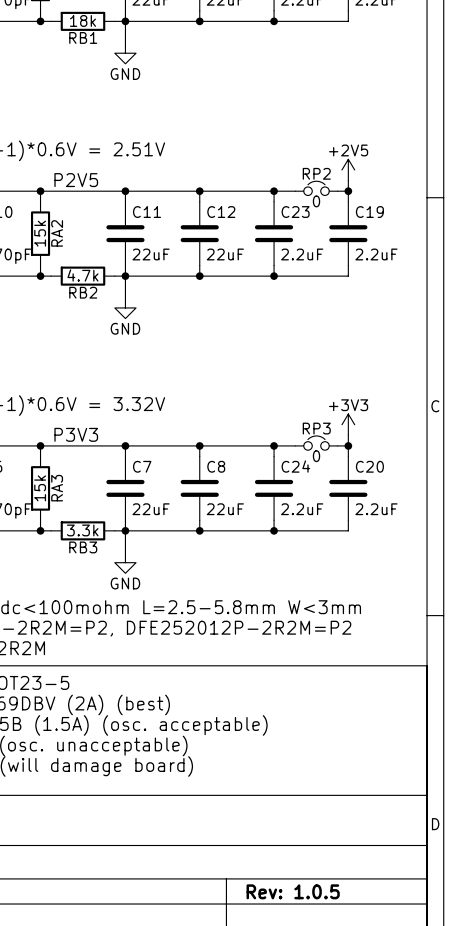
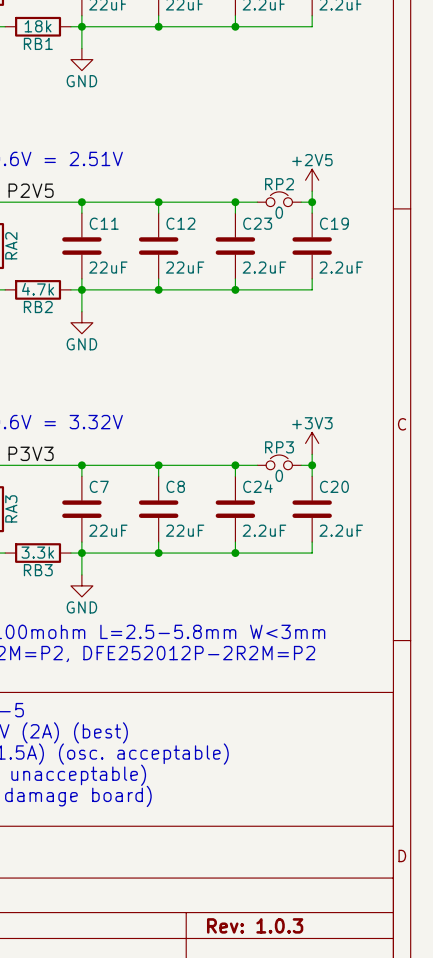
title block: Rev: 1.0.5 (293, 891) -> Rev: 1.0.3 (255, 925)

